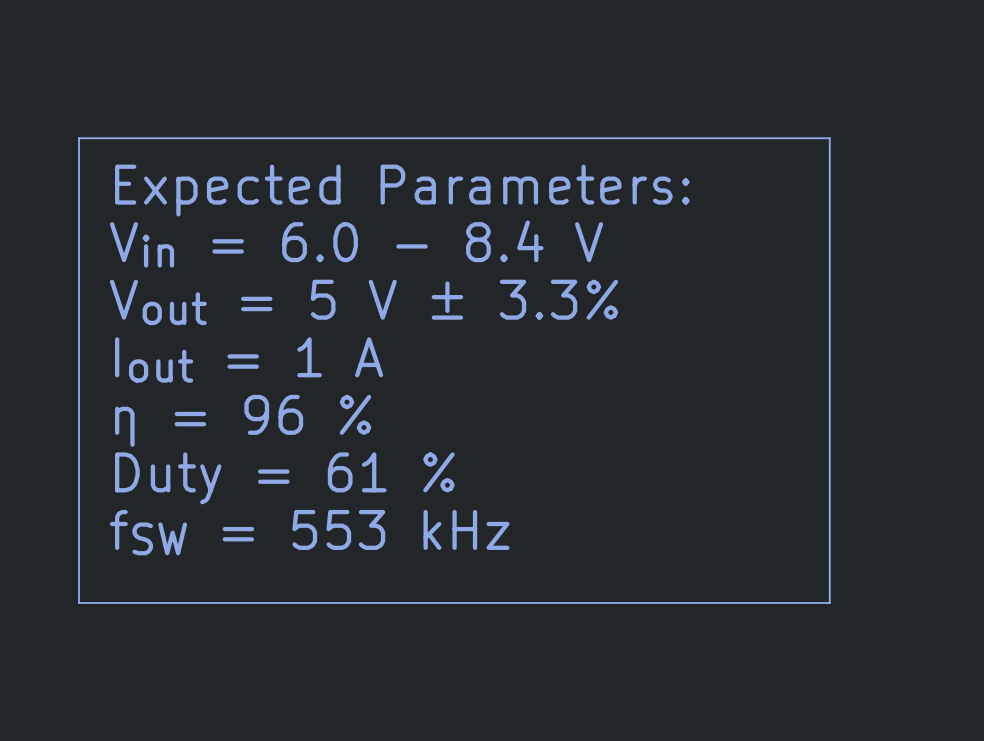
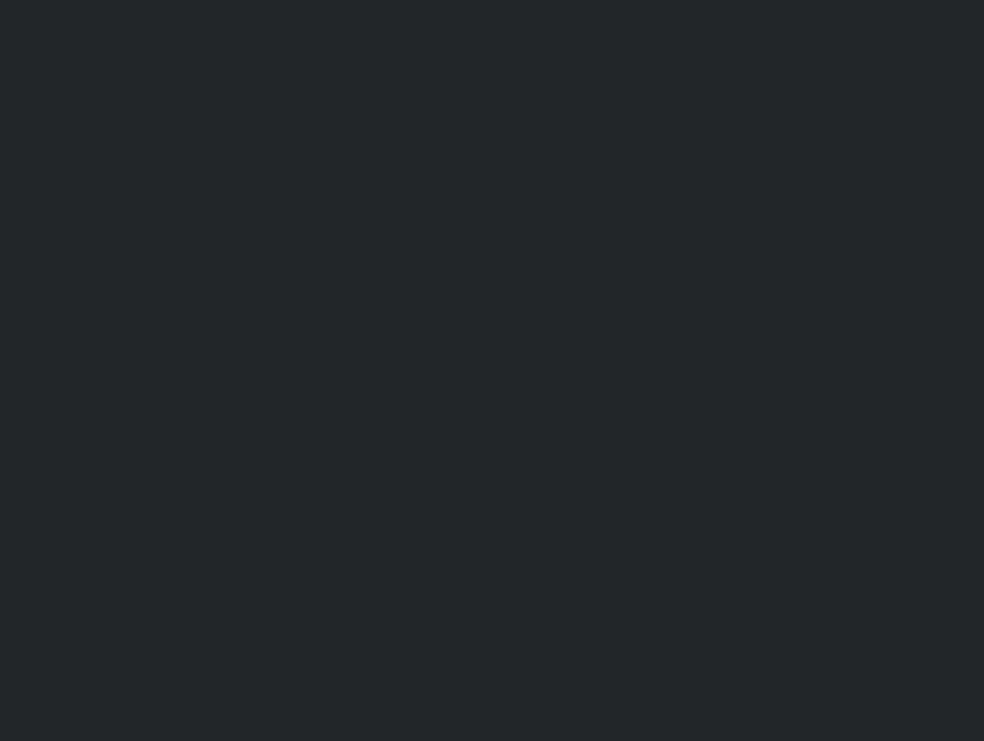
line: (79, 138) (829, 138) (829, 602) (79, 602) (79, 138) -> none
text: Expected Parameters: (402, 190) -> none
text: Vin = 6.0 - 8.4 V (356, 243) -> none
text: Vout = 5 V ± 3.3% (364, 302) -> none
text: Iout = 1 A (249, 359) -> none
text: η = 96 % (243, 420) -> none
text: Duty = 61 % (284, 478) -> none
text: fSW = 553 kHz (309, 532) -> none

